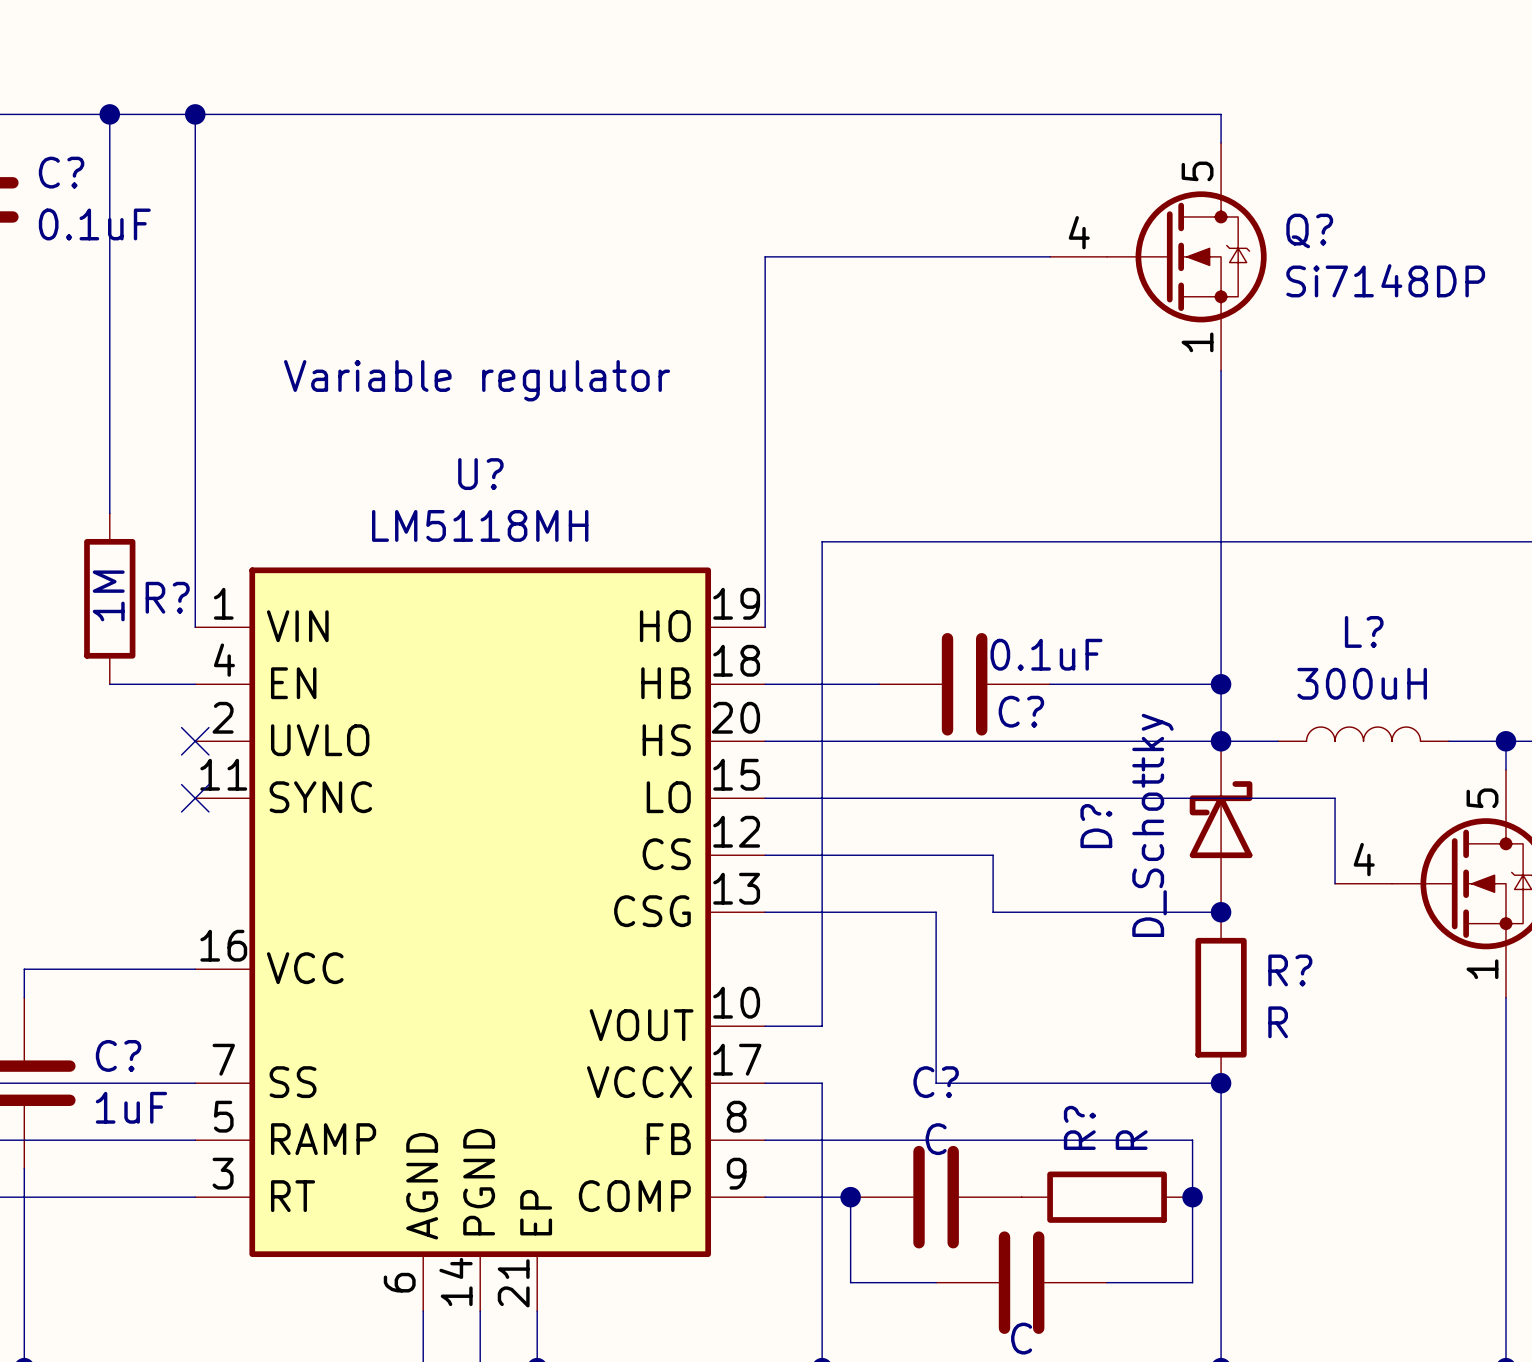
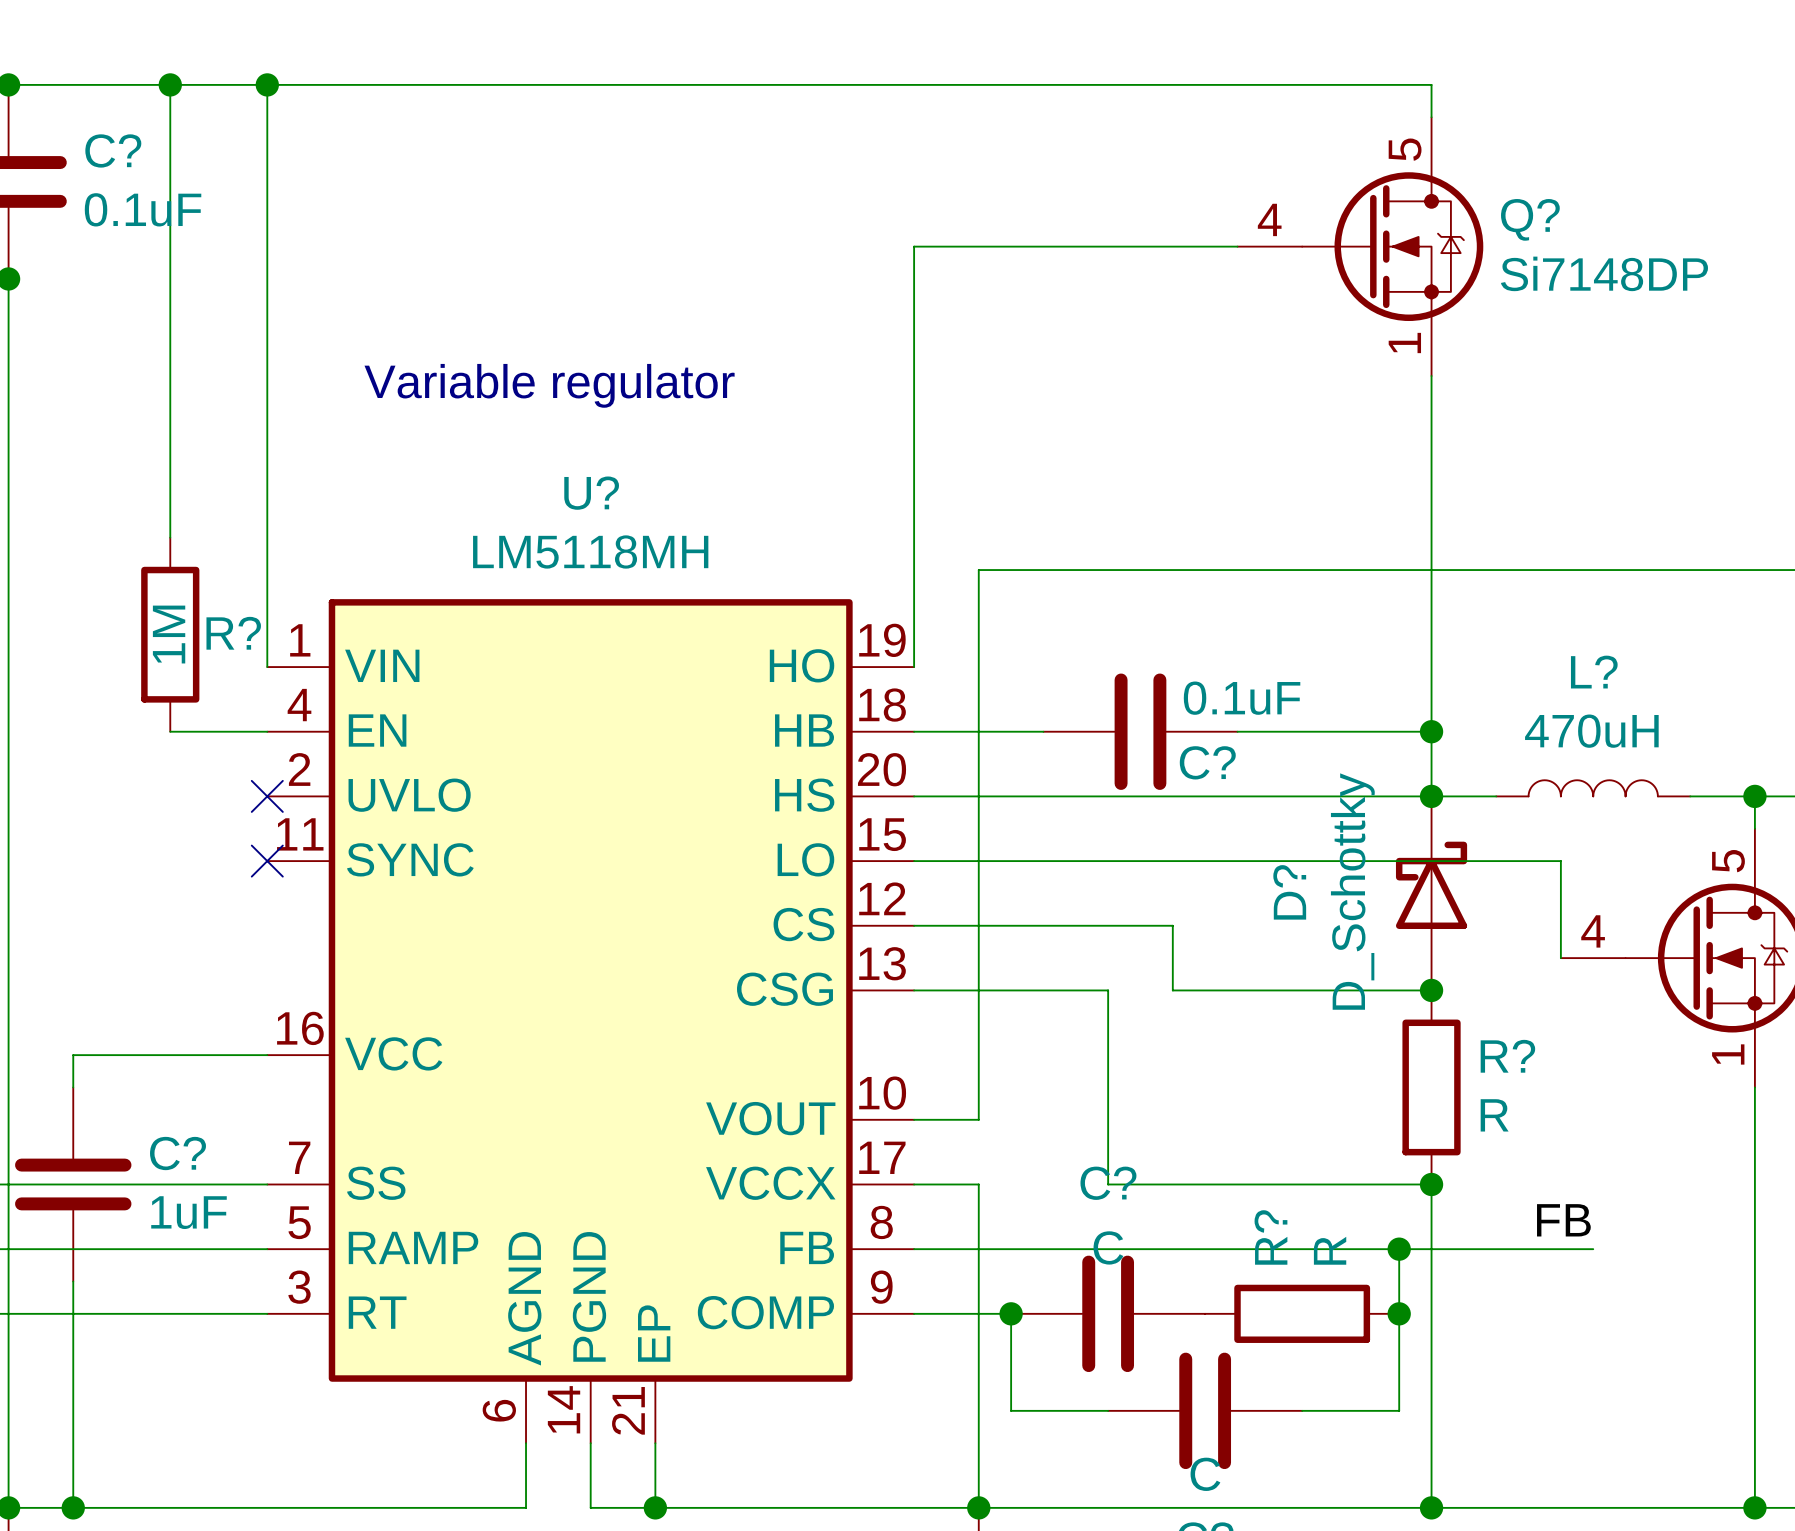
L? value: 300uH (1362, 683) -> 470uH (1591, 731)
label: none -> FB (1563, 1220)
wire: none -> (1399, 1249) (1593, 1249)
junction: none -> (1399, 1249)

